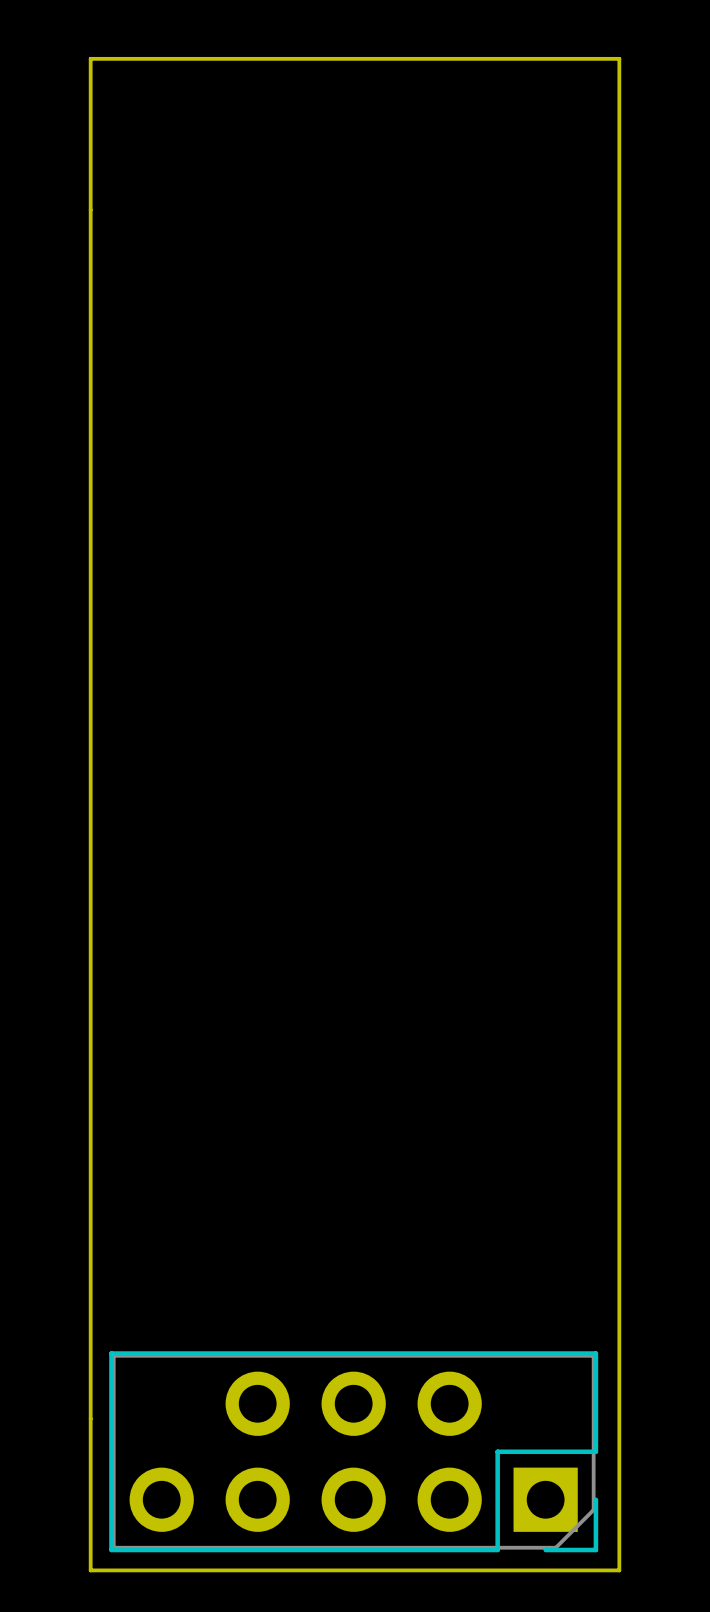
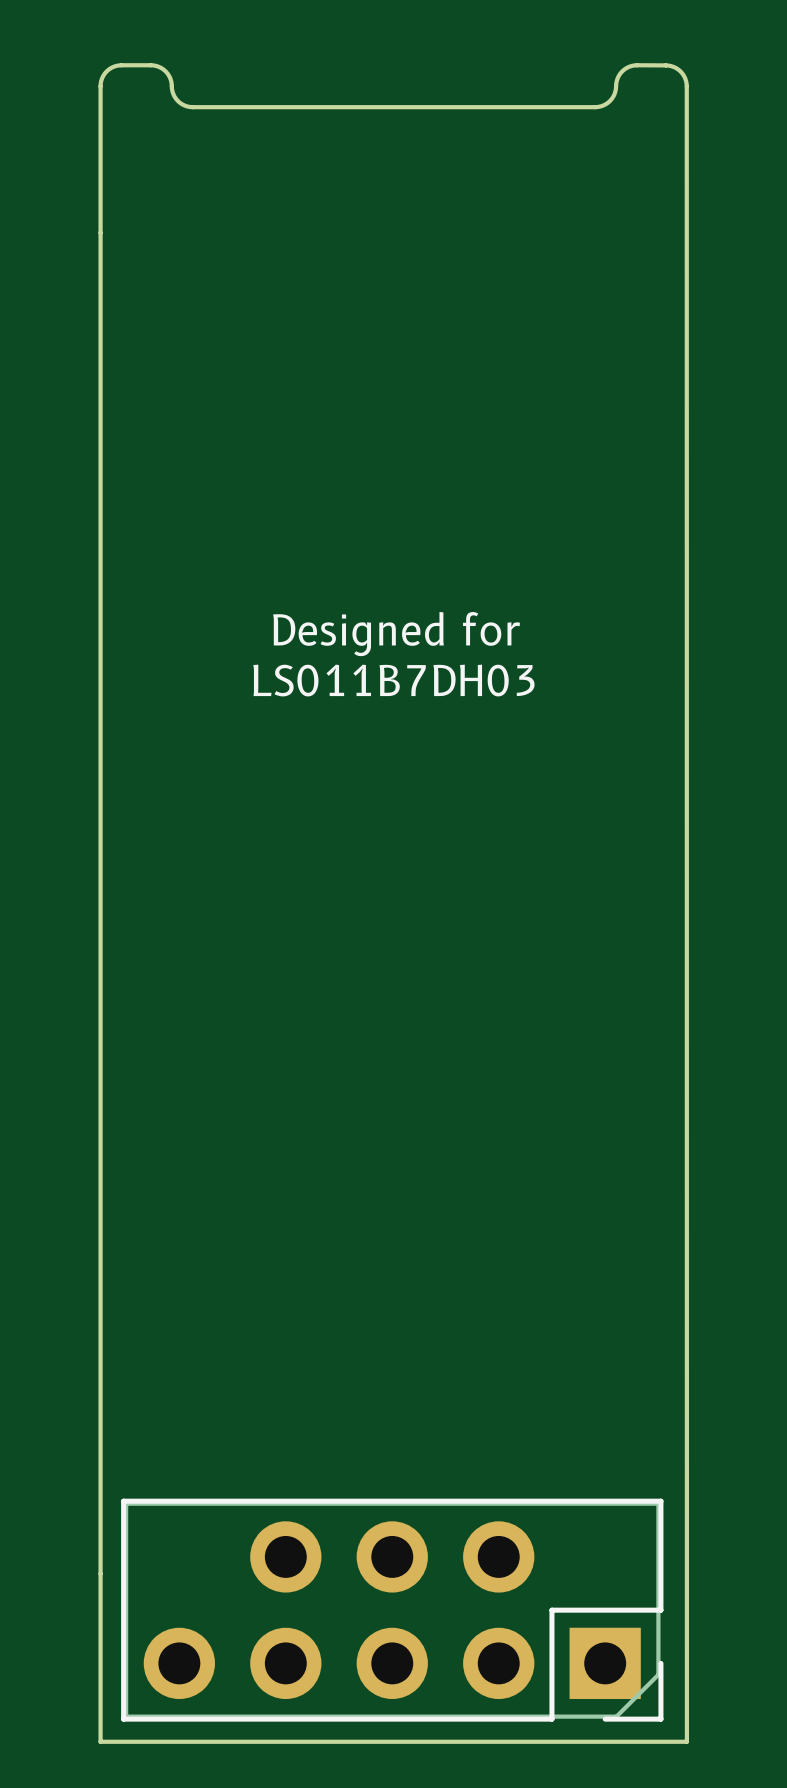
board edge: (90, 77) (90, 58) (619, 58) (619, 1570) -> (100, 86) (103, 75) (113, 66) (150, 65) (158, 66) (165, 71) (170, 78) (176, 98) (182, 104) (190, 107) (595, 107) (603, 105) (609, 101) (614, 94) (618, 75) (624, 69) (631, 65) (671, 66) (680, 71) (685, 78) (686, 86) (686, 1741)
text: none -> Designed for (396, 634)
text: none -> LS011B7DH03 (393, 680)

